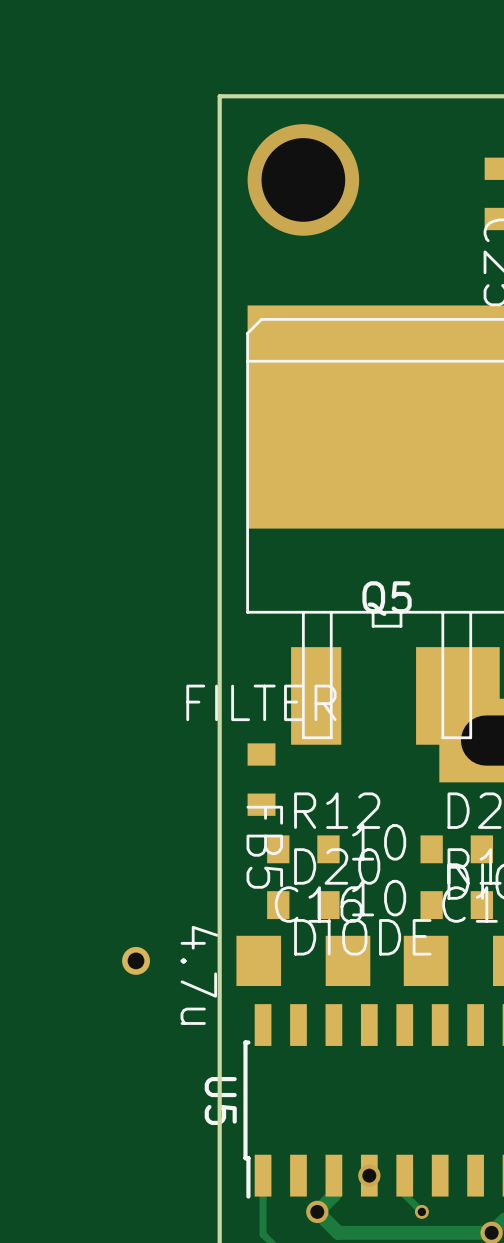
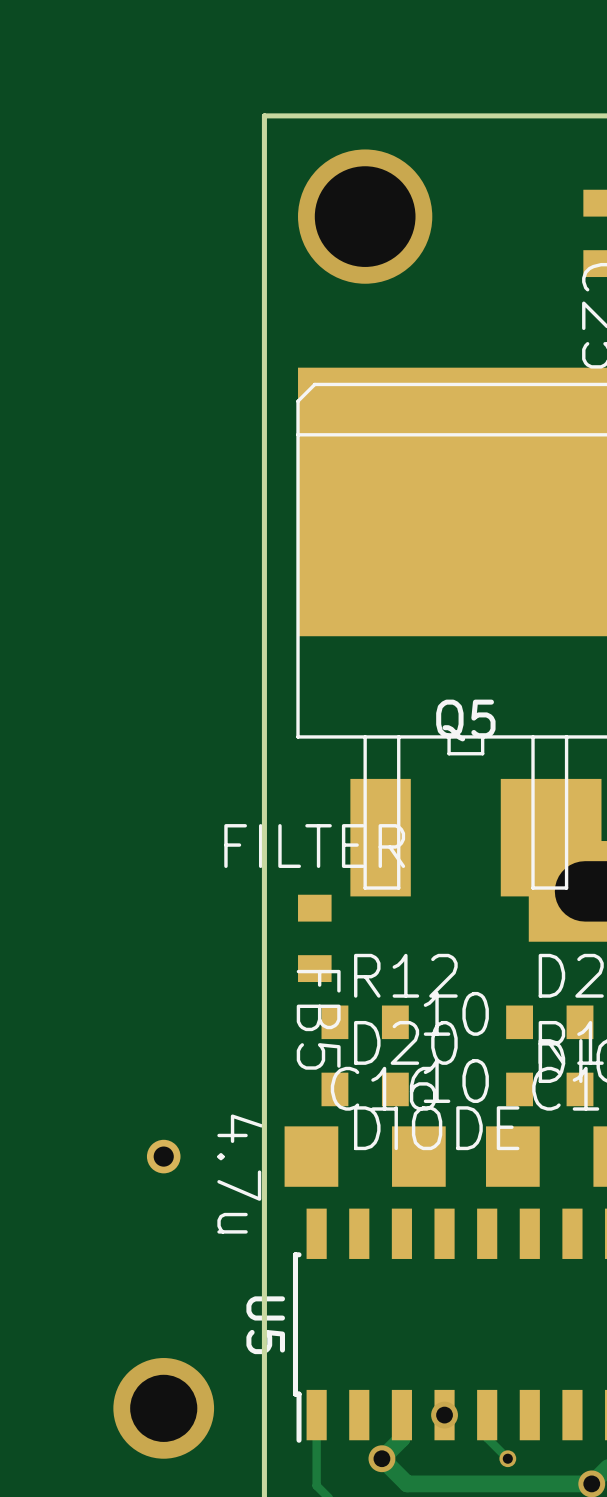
via: none -> (163, 1408)

